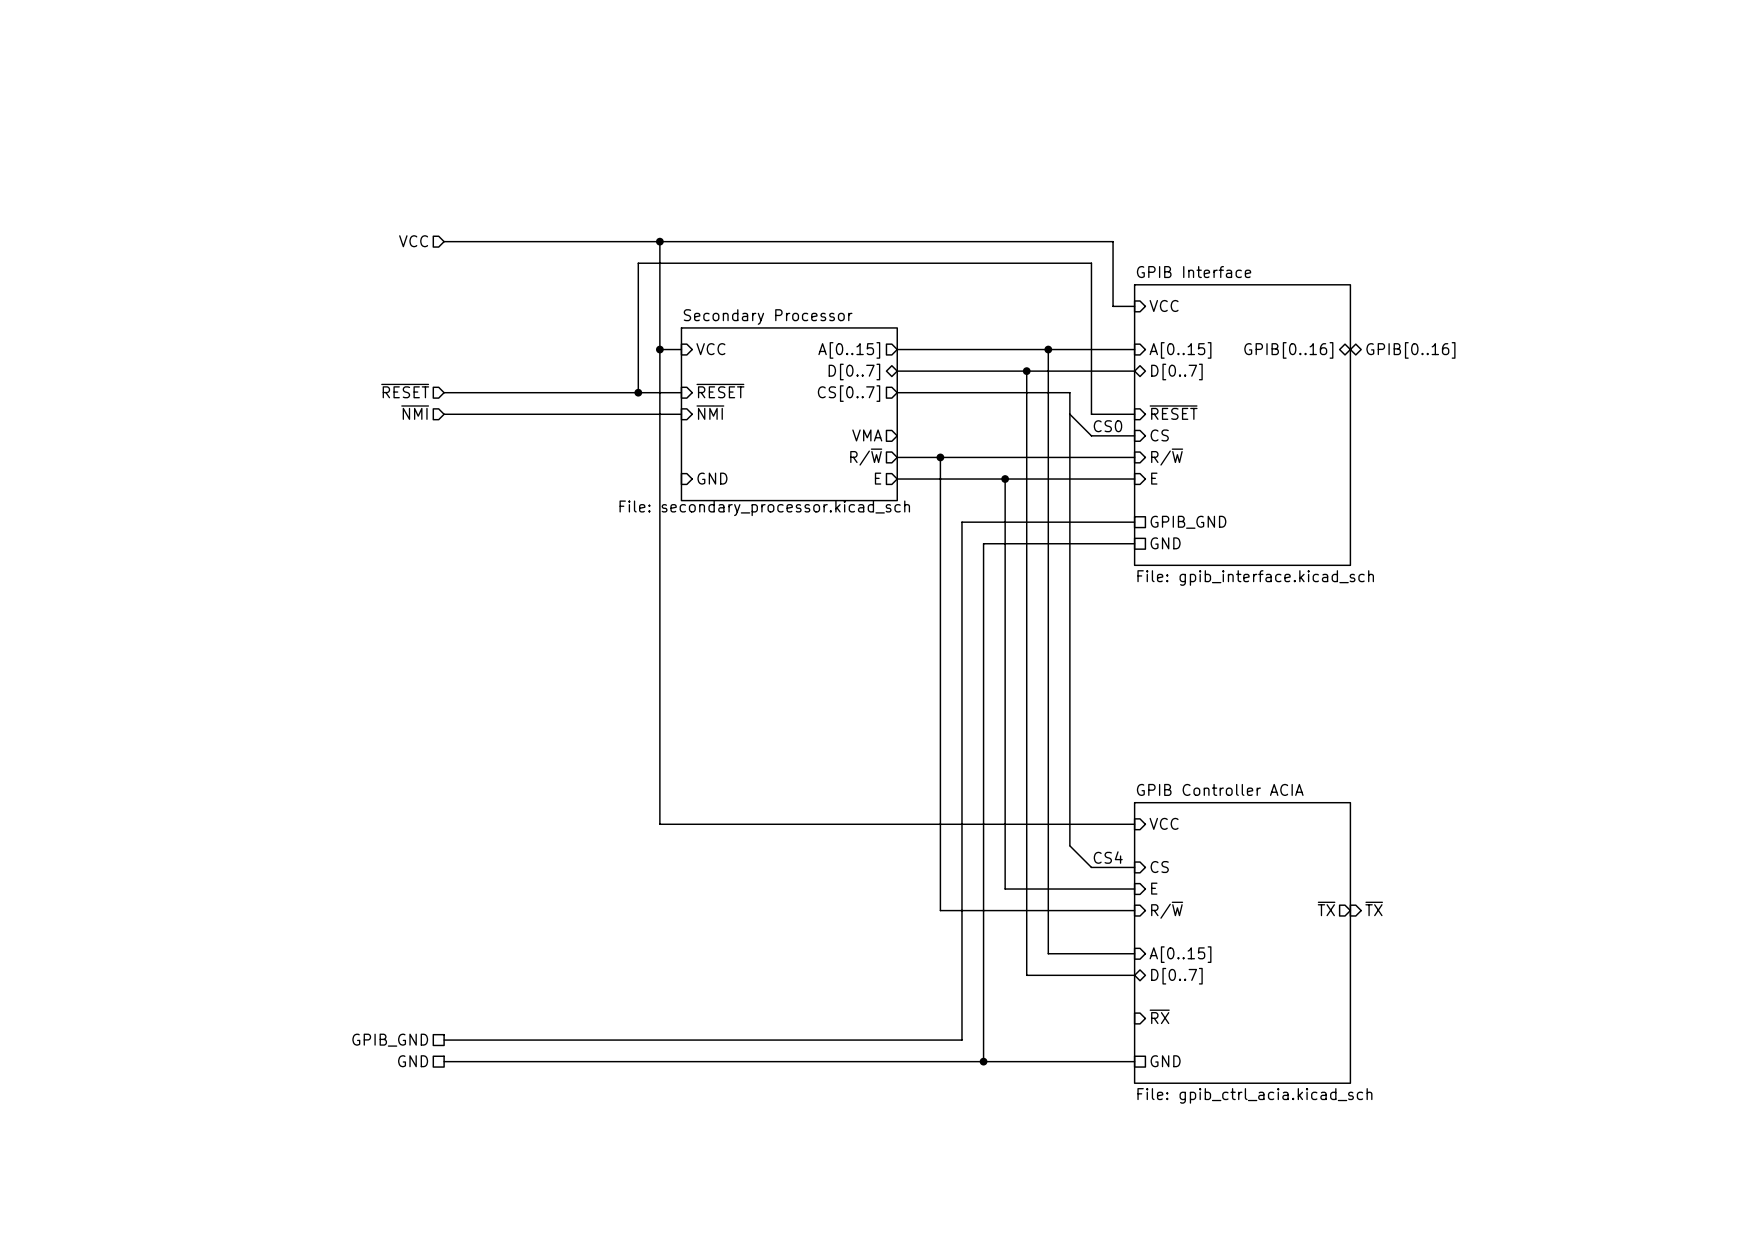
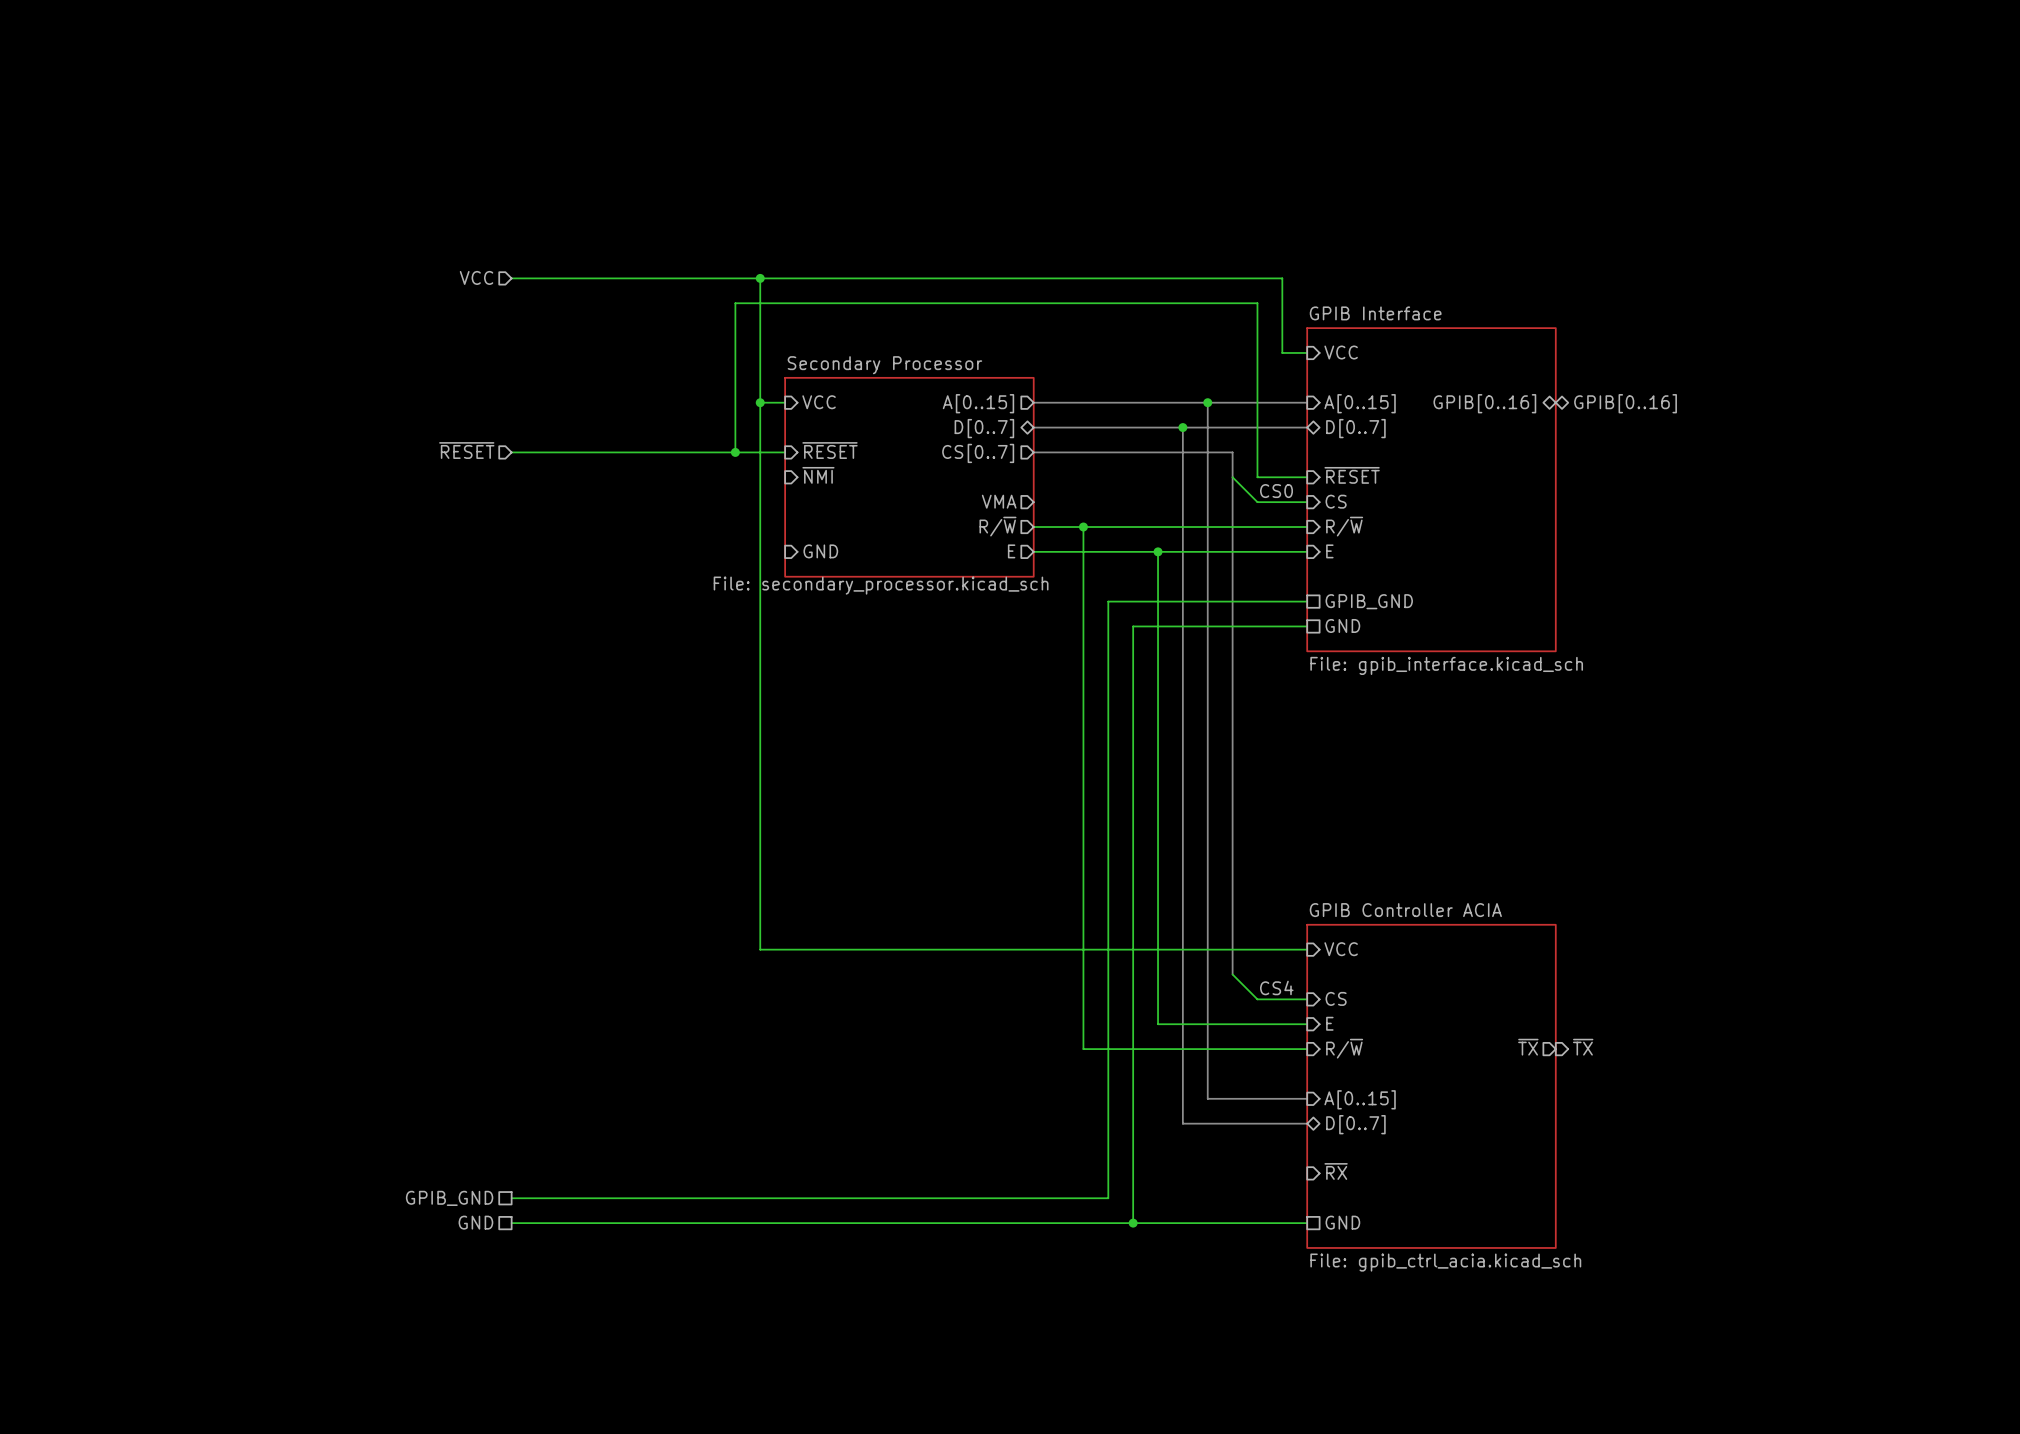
hierarchical label: ~{NMI} (415, 412) -> none
wire: (444, 414) (681, 414) -> none

